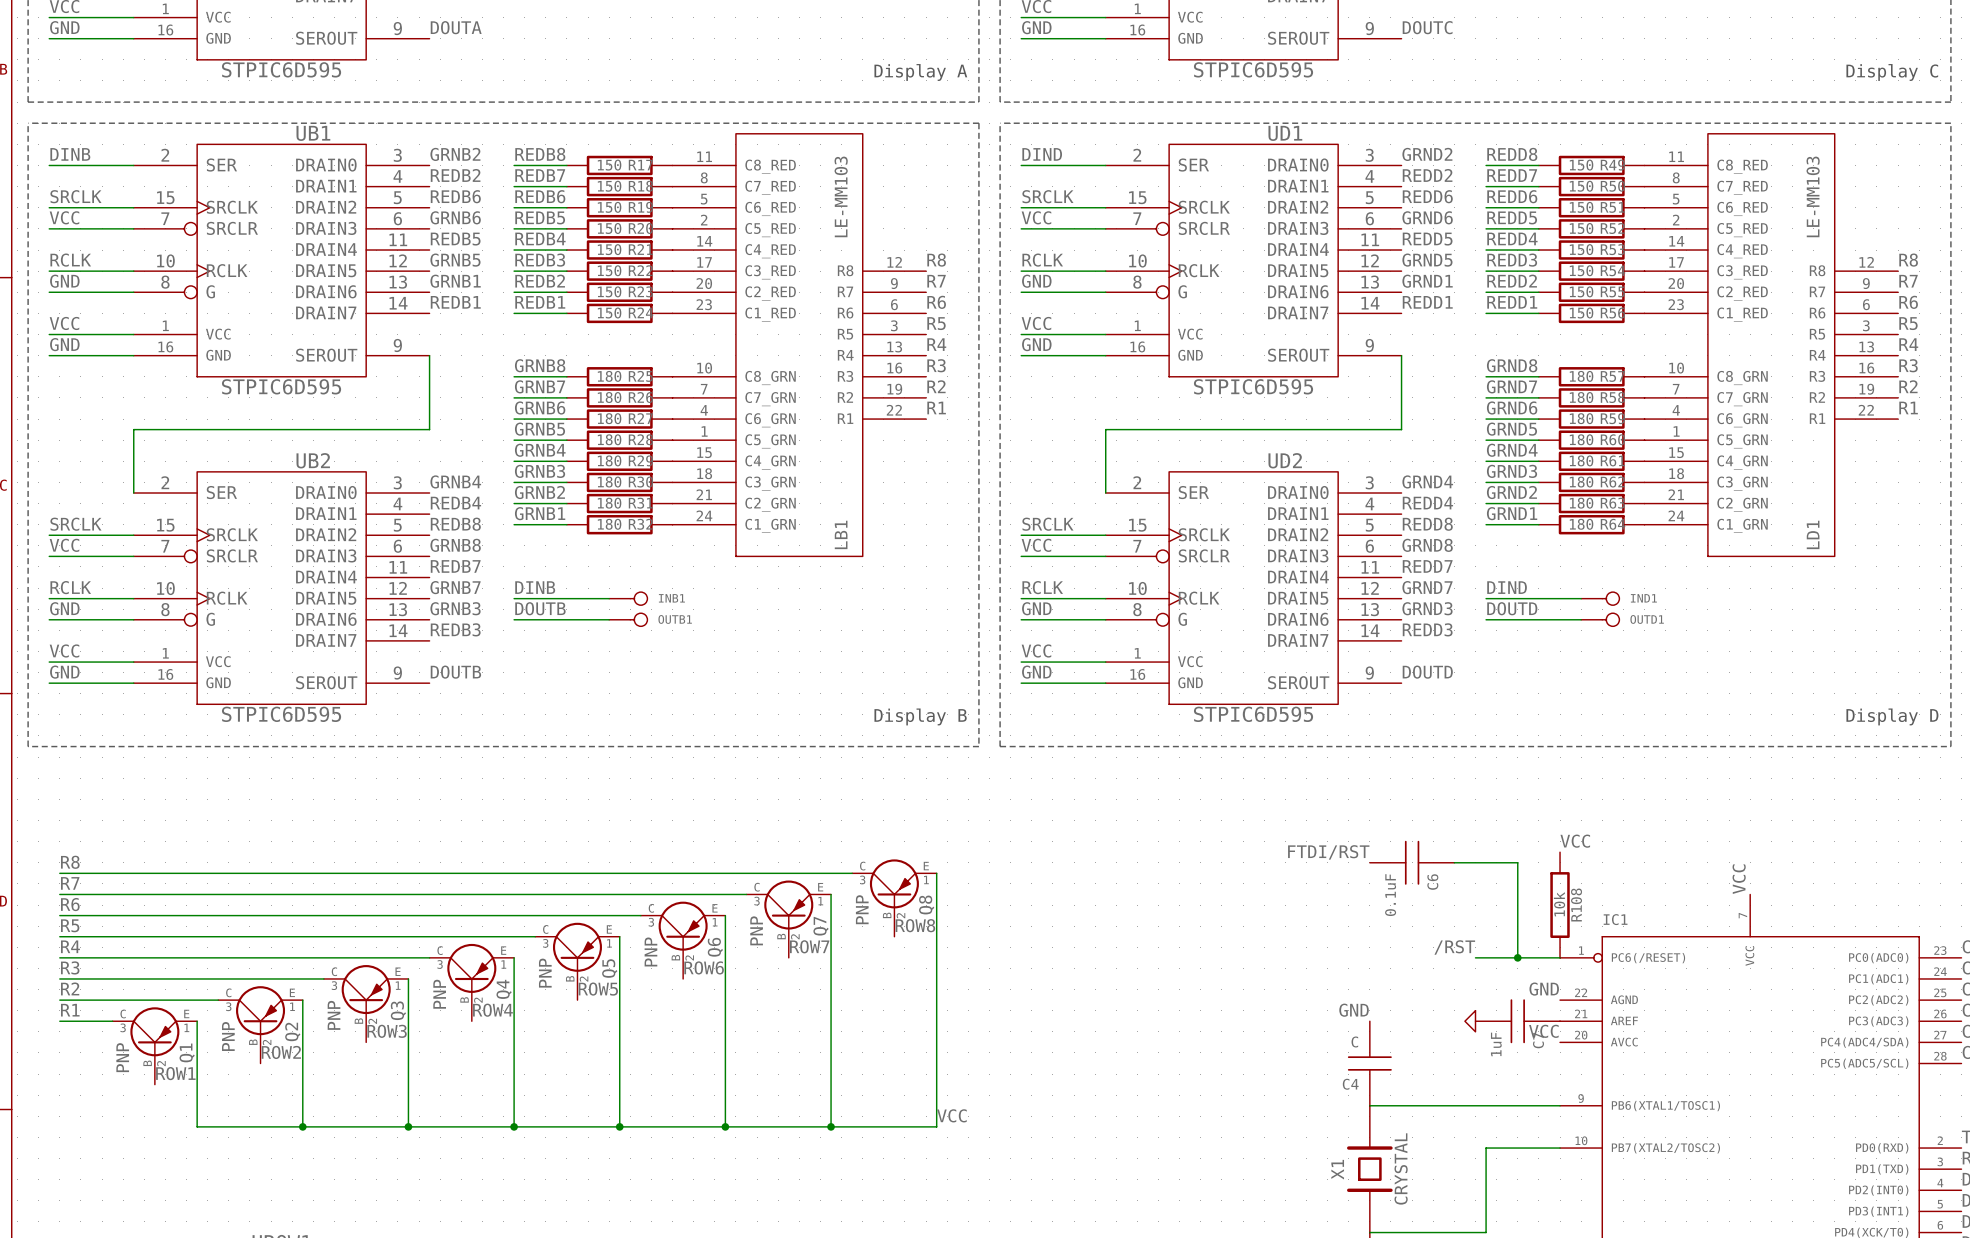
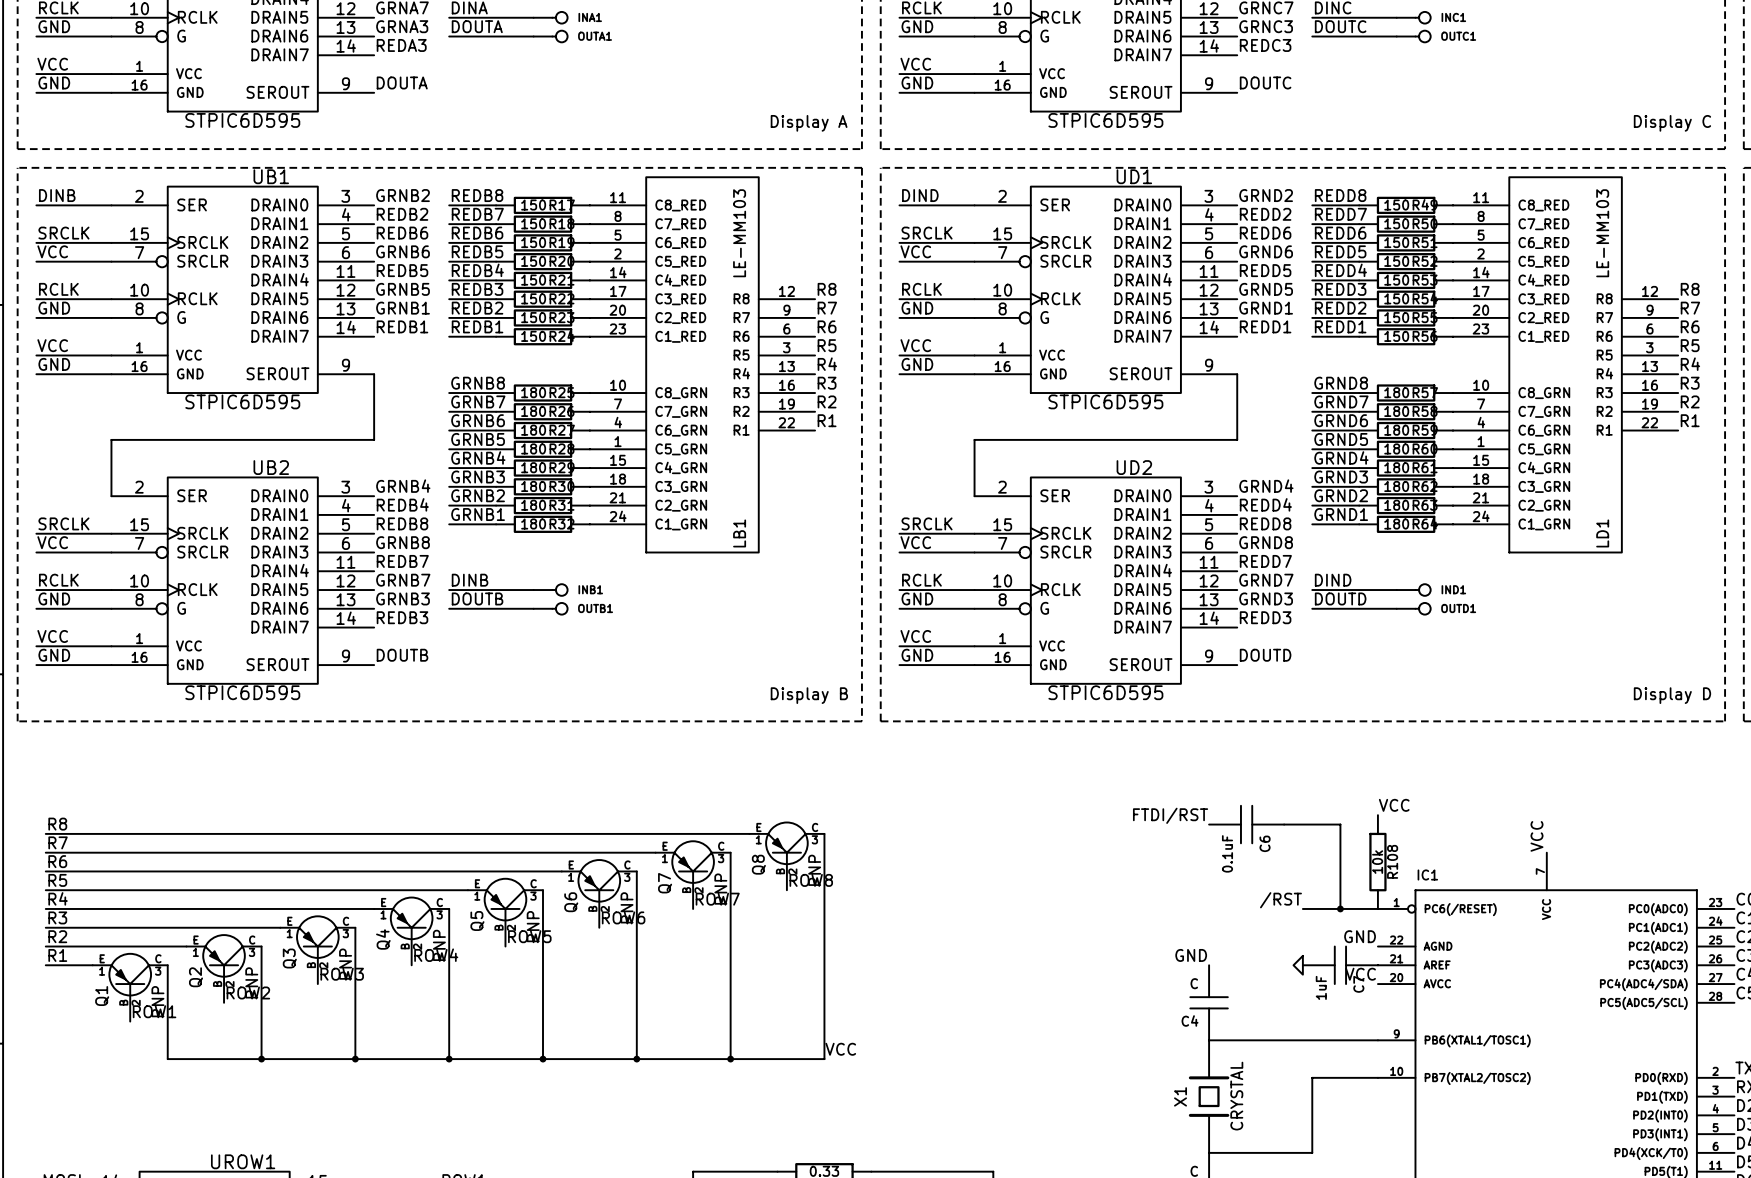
Q8 flip: as is (894, 883) -> left-right (786, 843)
Q7 flip: as is (788, 905) -> left-right (693, 862)
Q6 flip: as is (683, 926) -> left-right (599, 880)
Q5 flip: as is (577, 947) -> left-right (505, 899)
Q4 flip: as is (471, 968) -> left-right (411, 918)
Q3 flip: as is (366, 989) -> left-right (317, 937)
Q2 flip: as is (260, 1010) -> left-right (224, 955)
Q1 flip: as is (154, 1031) -> left-right (130, 974)

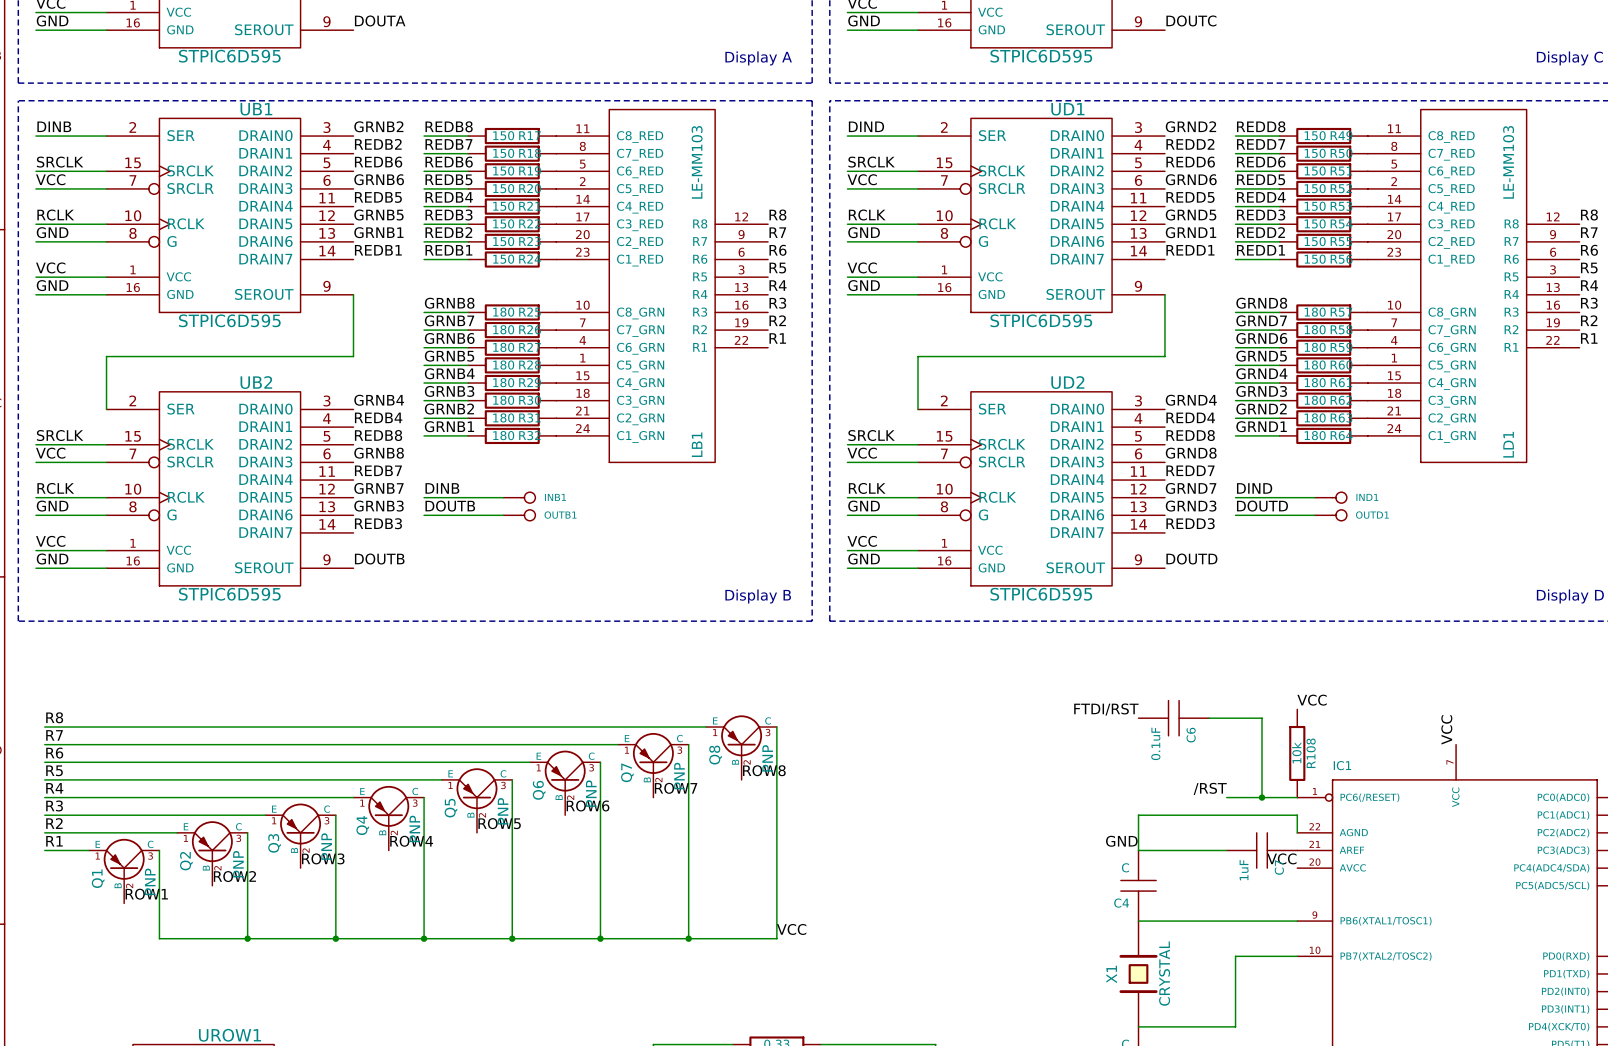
label: GND (1360, 936) -> none
wire: none -> (1297, 832) (1297, 815) (1138, 815) (1138, 850) (1226, 850)
power symbol: (1298, 965) -> none

